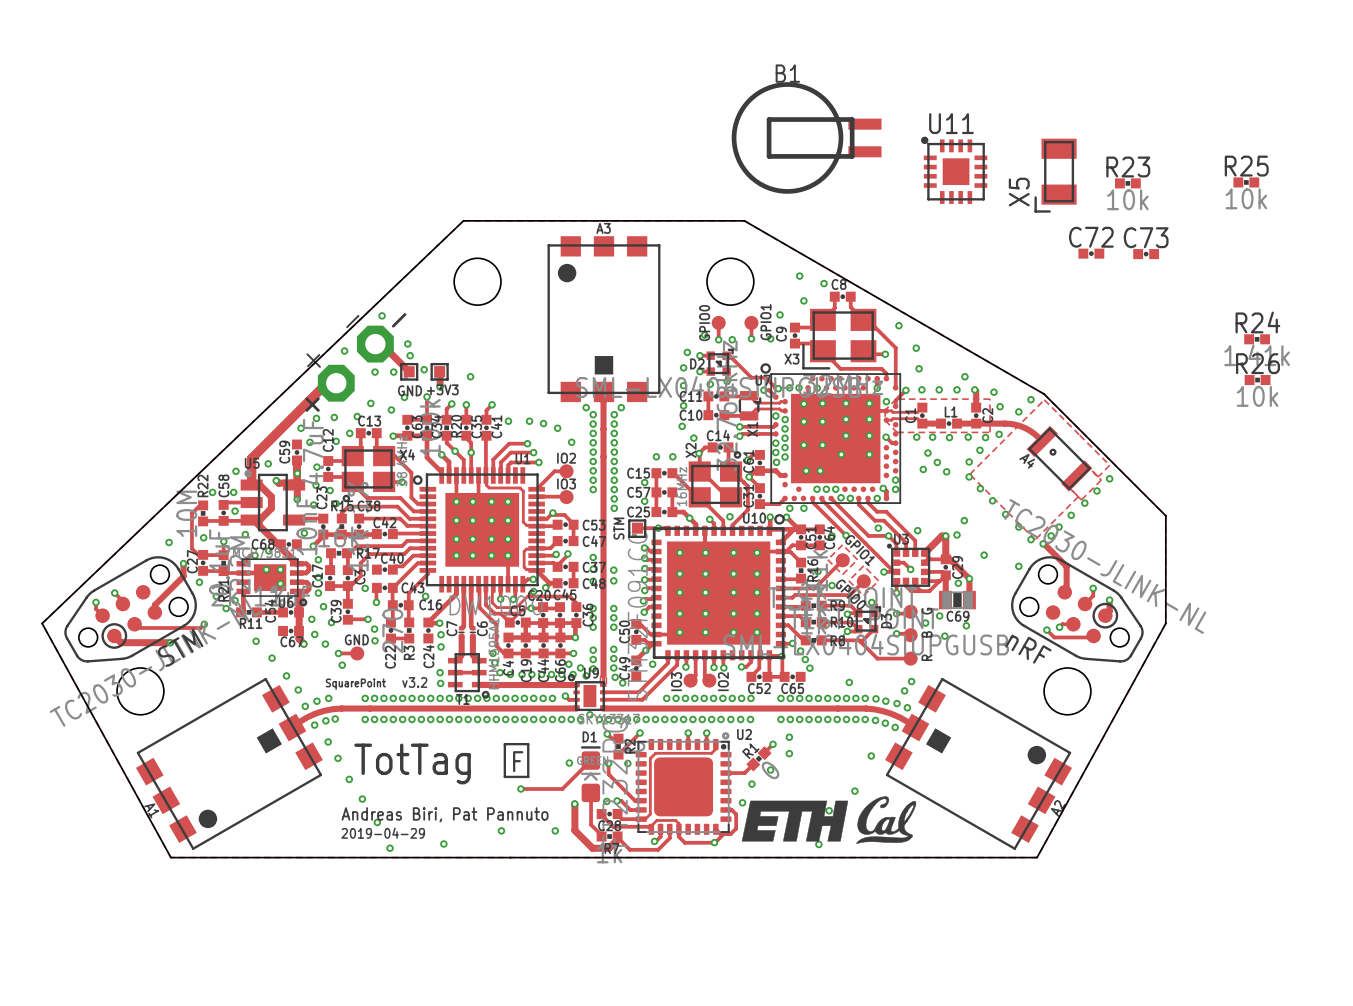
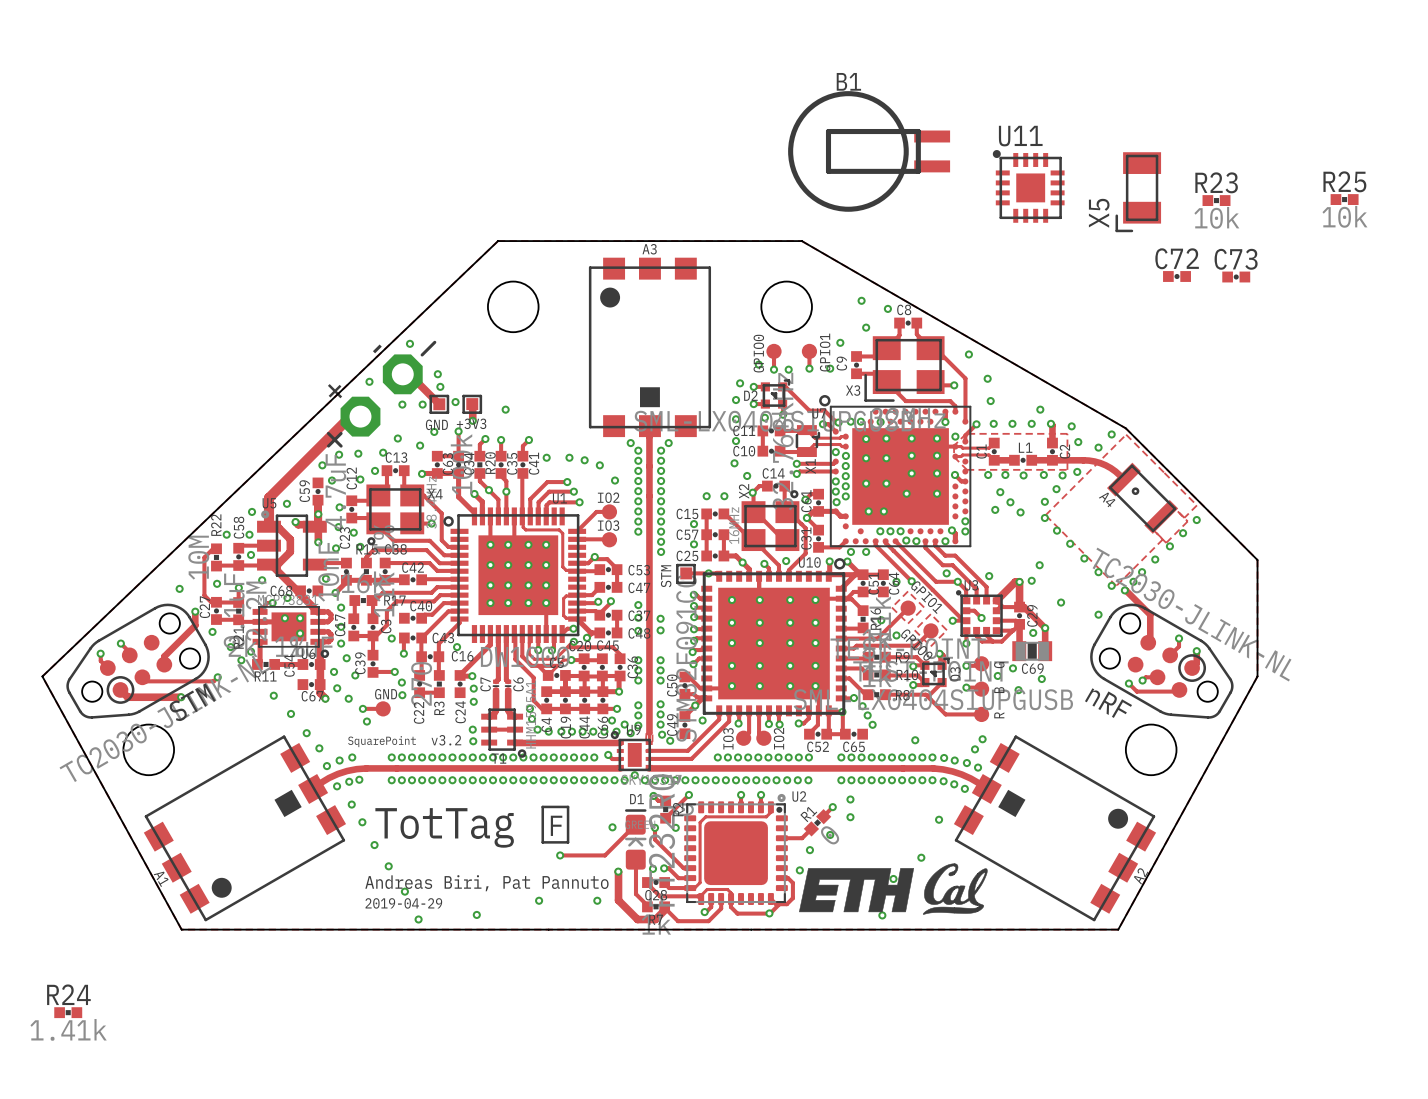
R24 position: (1257, 339) -> (68, 1012)
R26: 10k (1257, 380) -> none

